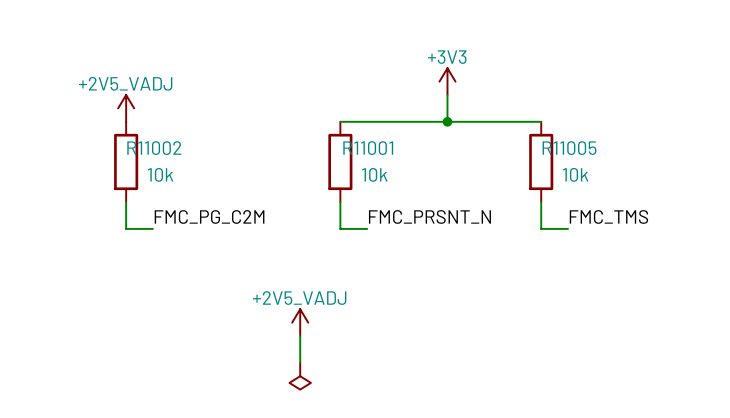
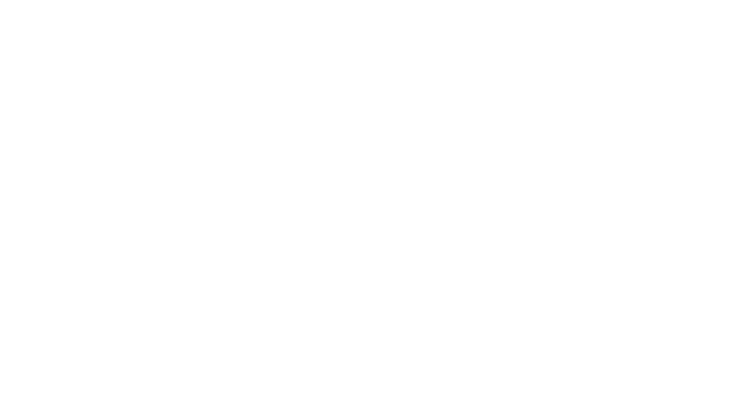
power symbol: +3V3 (447, 81) -> none
wire: (447, 95) (447, 121) -> none
power symbol: +2V5_VADJ (126, 108) -> none
wire: (340, 121) (541, 121) -> none
junction: (447, 121) -> none
R11002: 10k (126, 161) -> none
R11001: 10k (340, 161) -> none
R11005: 10k (541, 161) -> none
wire: (126, 202) (126, 228) (152, 228) -> none
wire: (340, 202) (340, 228) (367, 228) -> none
wire: (541, 202) (541, 228) (567, 228) -> none
label: FMC_PG_C2M (209, 216) -> none
label: FMC_PRSNT_N (429, 216) -> none
label: FMC_TMS (608, 216) -> none
power symbol: +2V5_VADJ (300, 322) -> none
wire: (300, 336) (300, 362) -> none
power symbol: (300, 376) -> none

